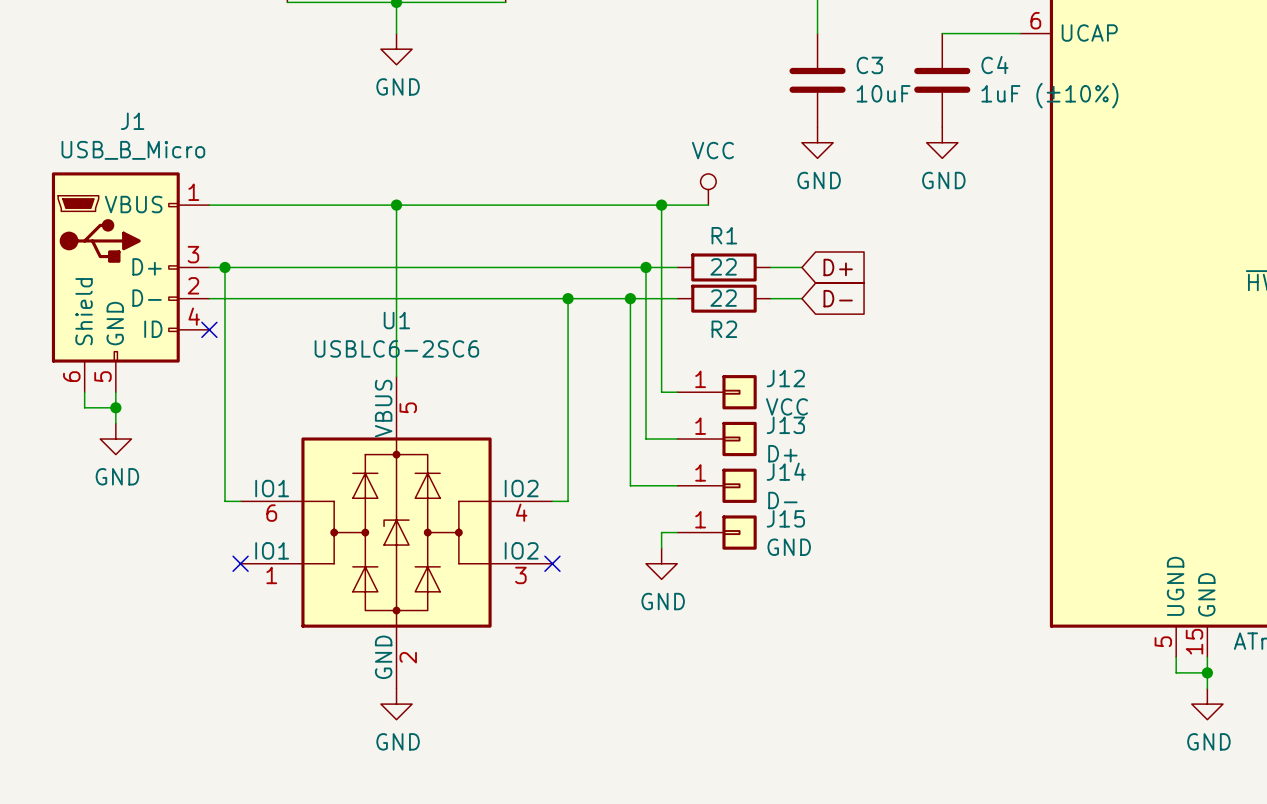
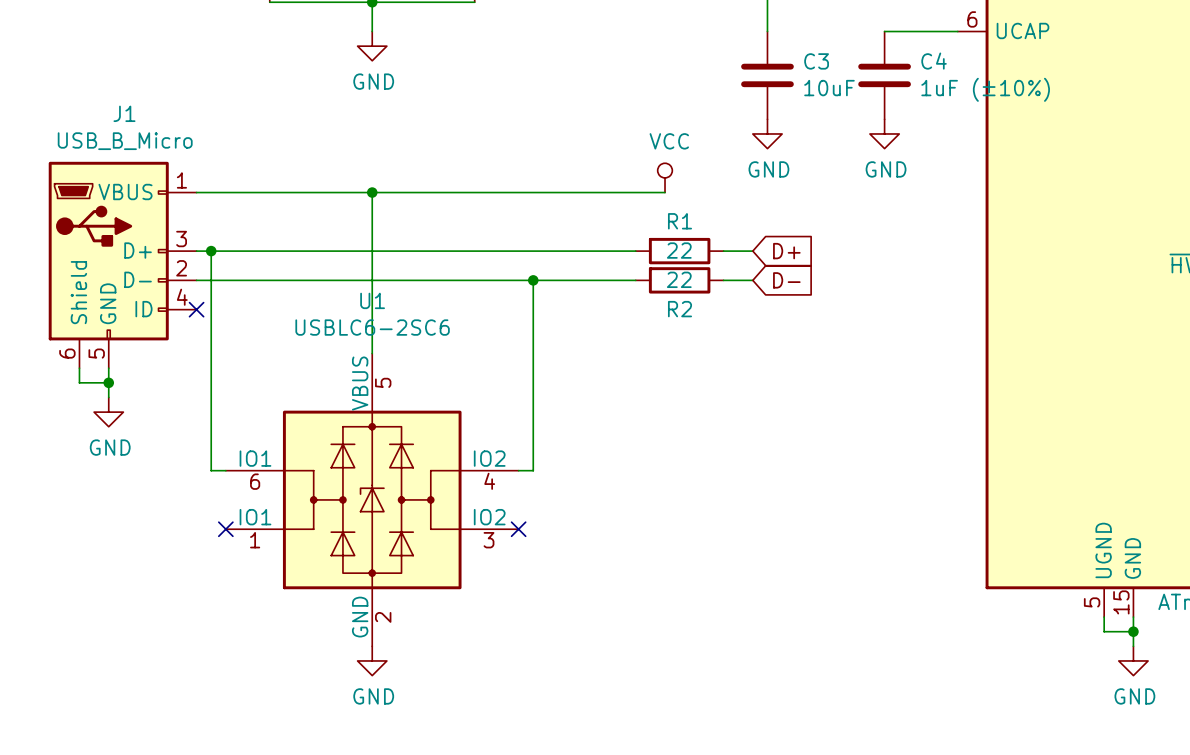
wire: (661, 205) (661, 392) (677, 392) -> none
junction: (661, 205) -> none
wire: (646, 267) (646, 439) (677, 439) -> none
junction: (646, 267) -> none
wire: (630, 298) (630, 485) (677, 485) -> none
junction: (630, 298) -> none
J12: VCC (716, 392) -> none
J13: D+ (716, 439) -> none
J14: D- (716, 485) -> none
wire: (677, 532) (661, 532) (661, 548) -> none
J15: GND (716, 532) -> none
power symbol: GND (661, 563) -> none

